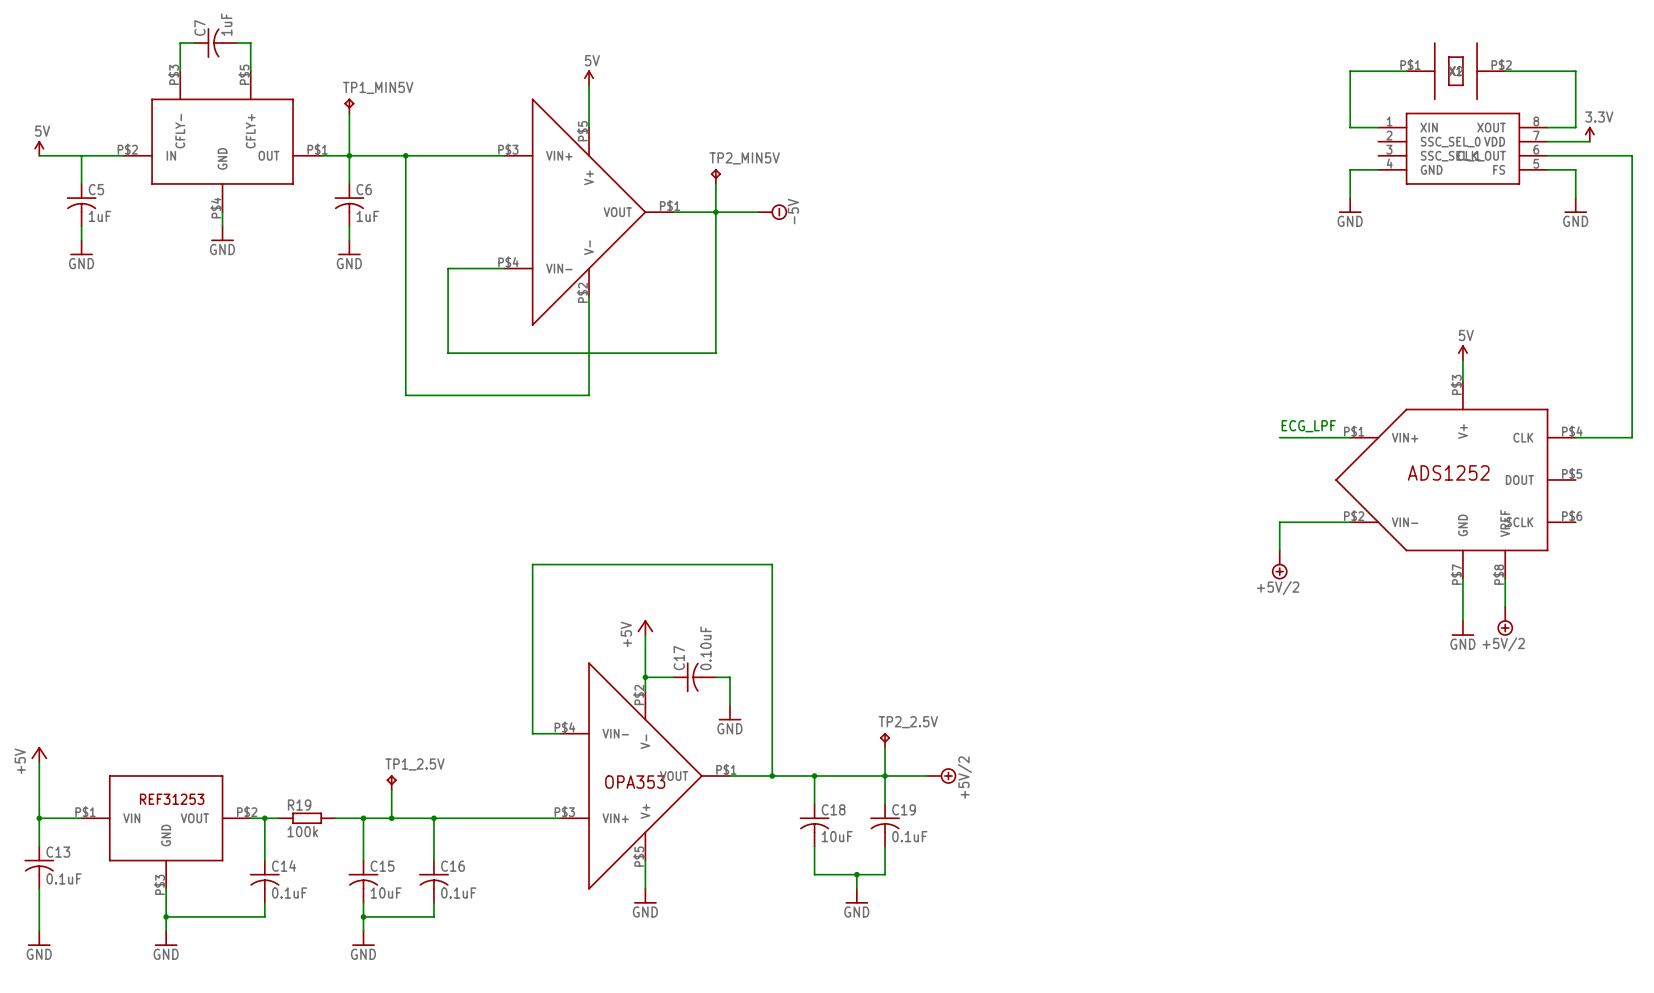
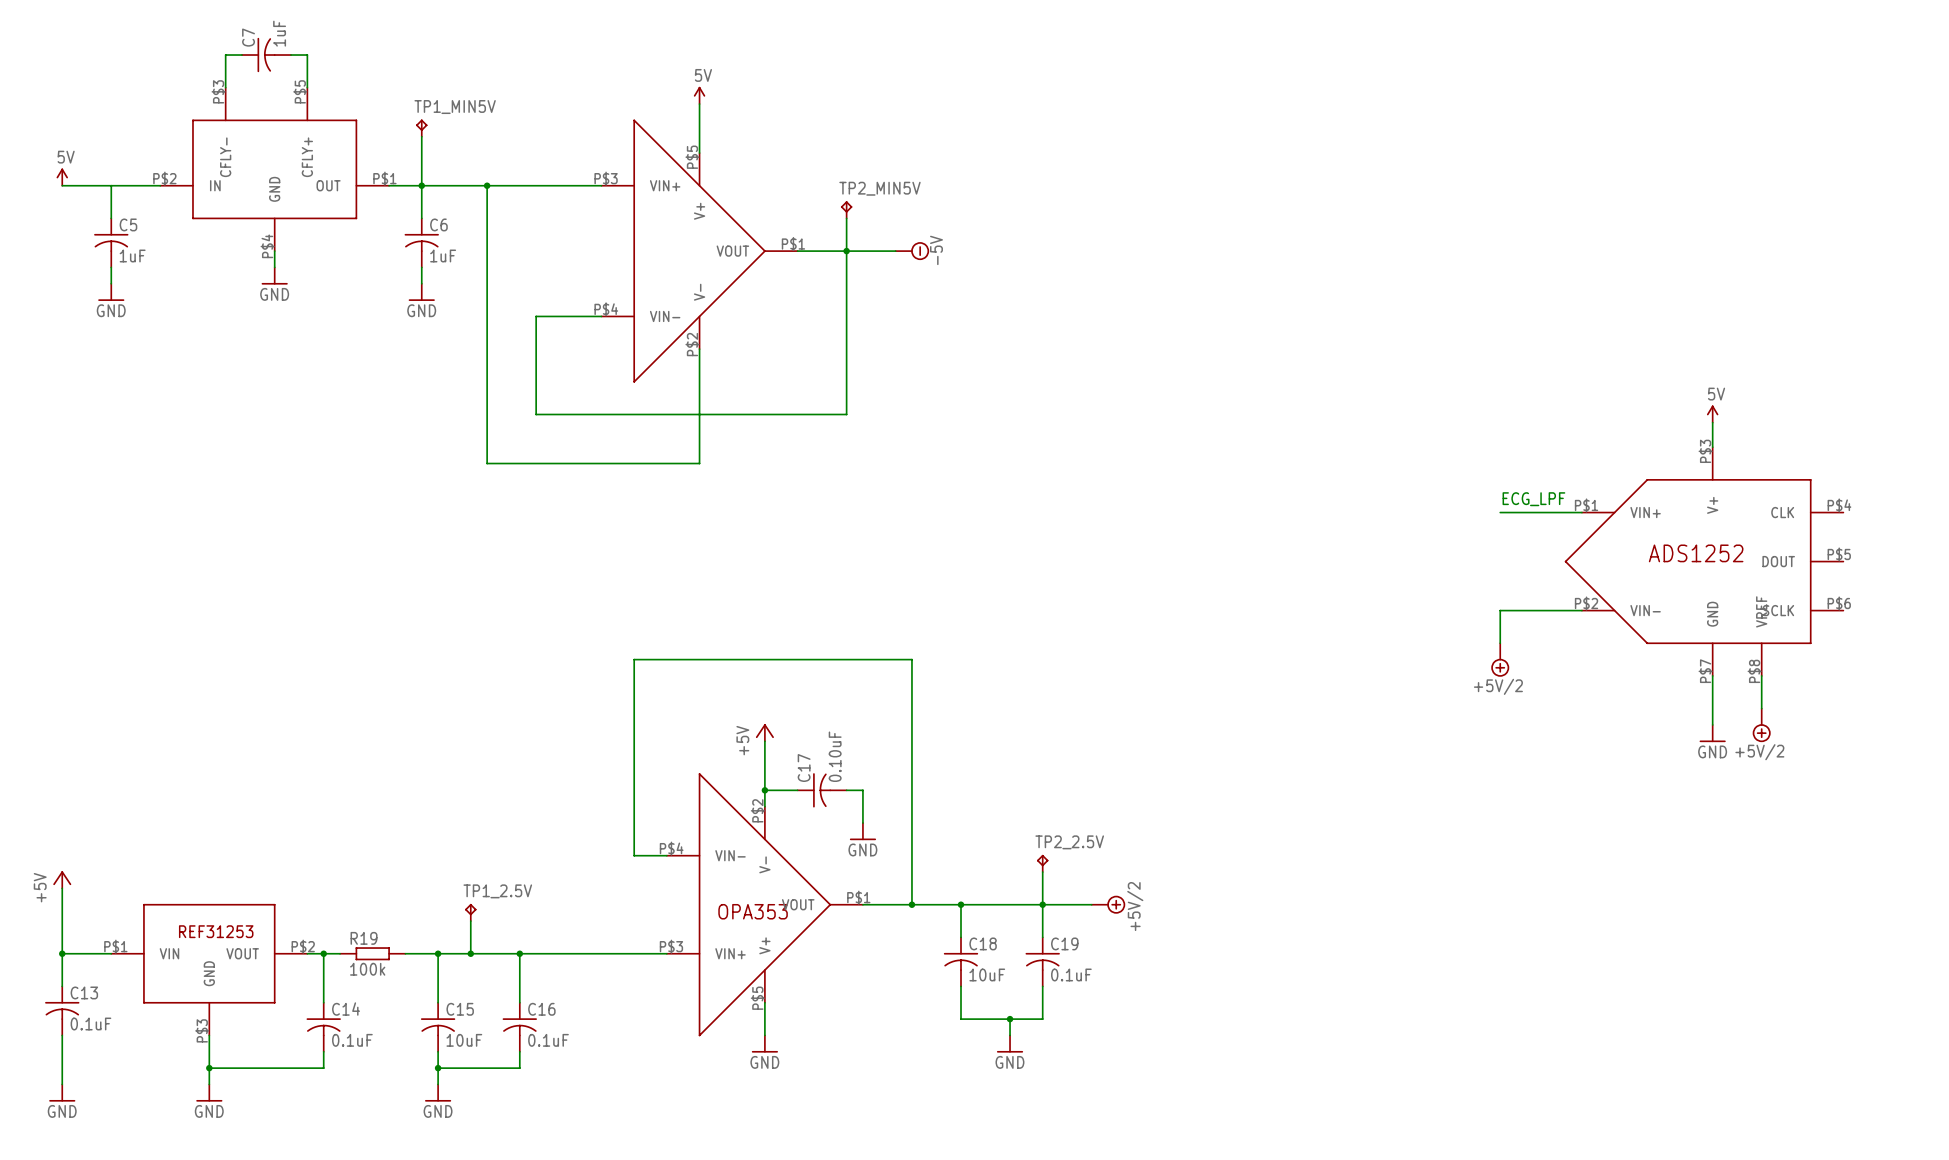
wire: (1406, 71) (1350, 71) (1350, 127) (1378, 127) -> none
part: (1455, 71) -> none
wire: (1505, 71) (1575, 71) (1575, 127) (1547, 127) -> none
power symbol: 3.3V (1589, 134) -> none
wire: (1547, 141) (1589, 141) -> none
part: (1462, 148) -> none
wire: (1547, 155) (1632, 155) (1632, 437) (1575, 437) -> none
wire: (1378, 169) (1350, 169) (1350, 198) -> none
wire: (1547, 169) (1575, 169) (1575, 198) -> none
power symbol: GND (1350, 205) -> none
power symbol: GND (1575, 205) -> none

